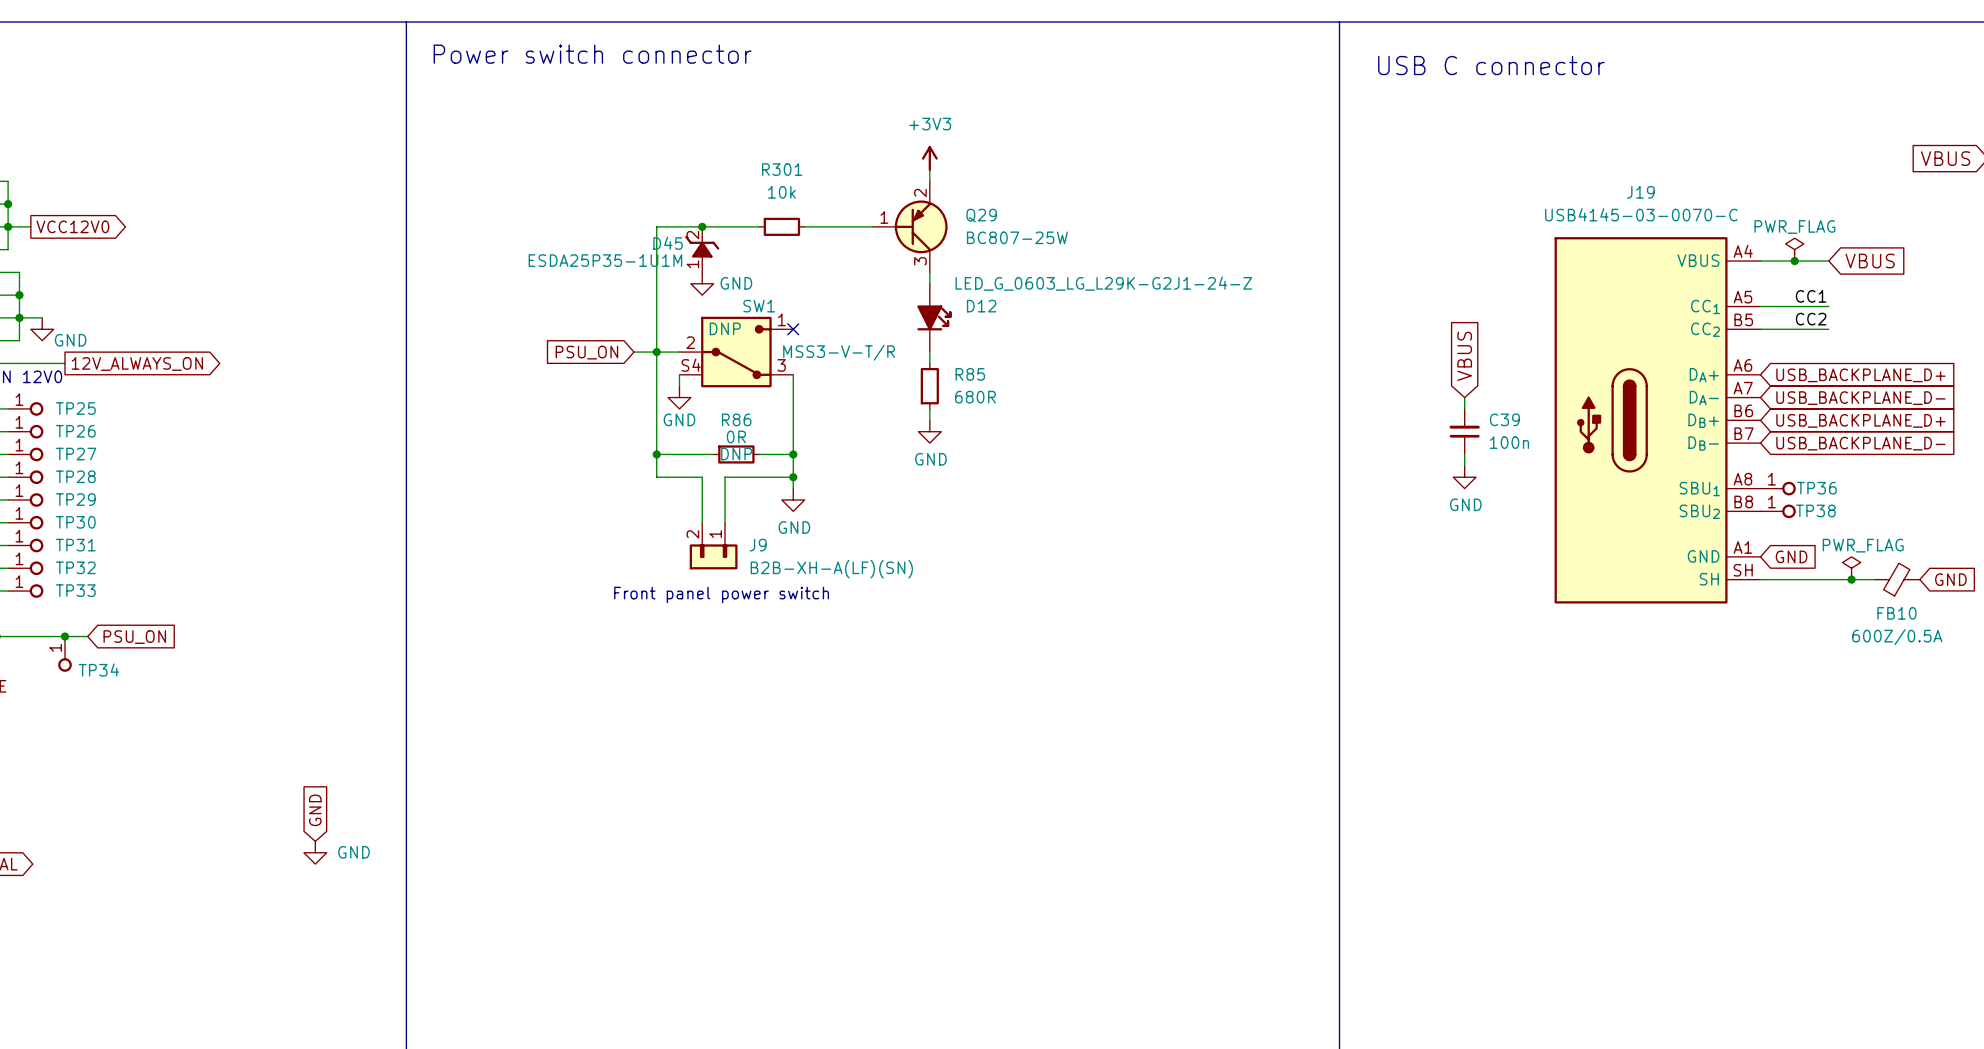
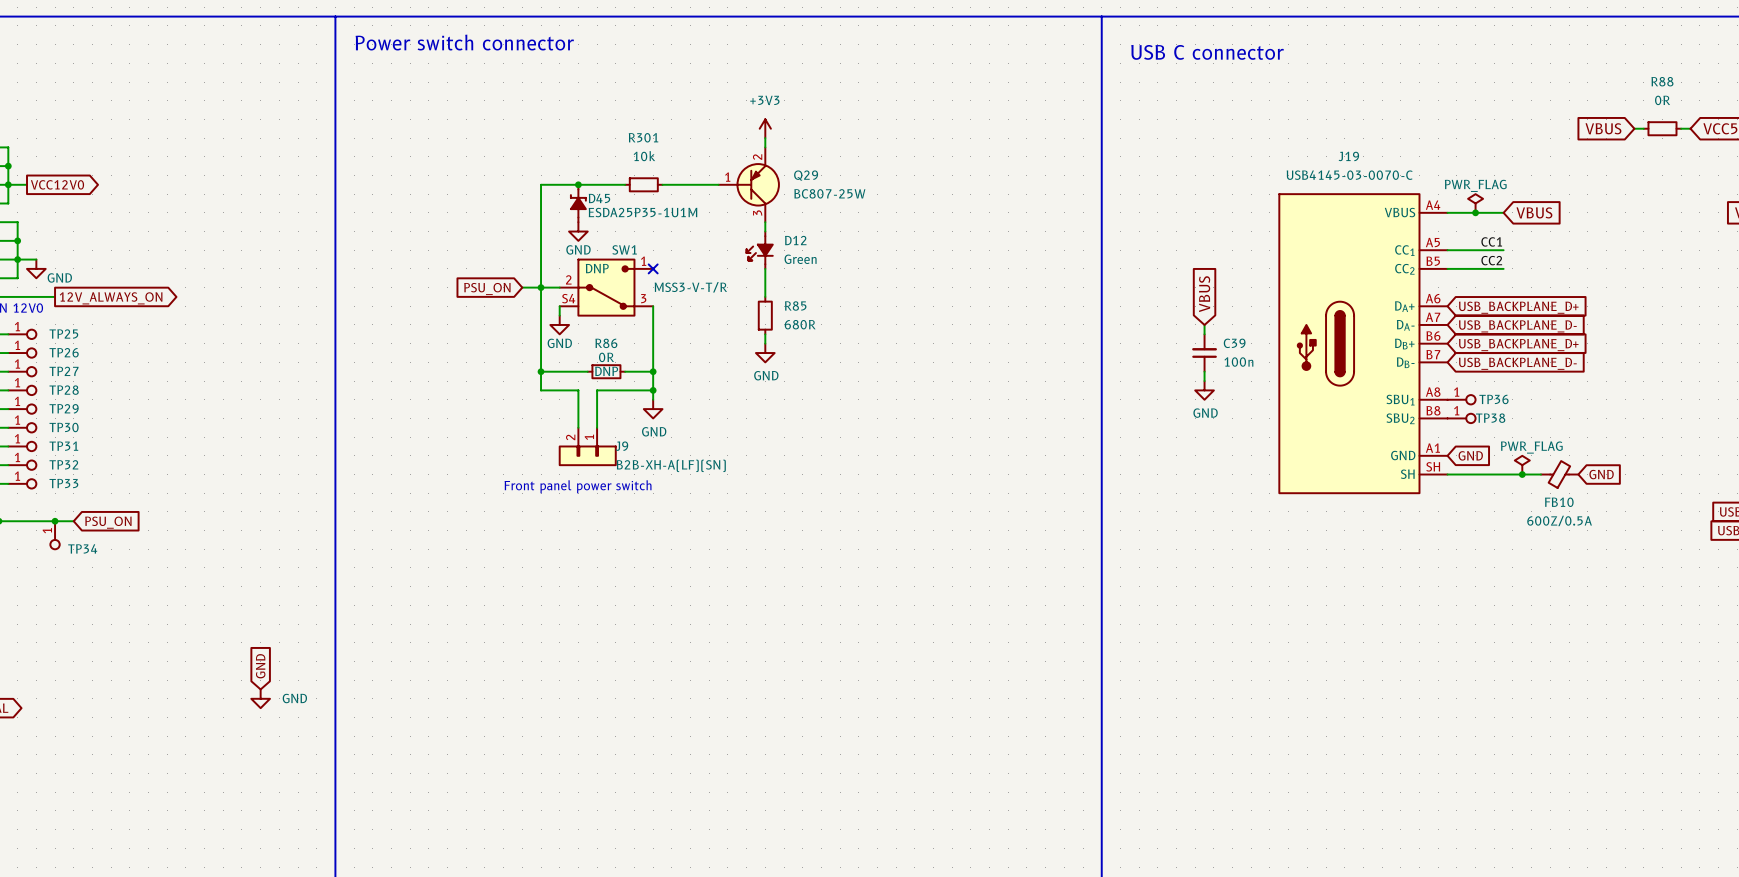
D45 symbol: [685, 226, 720, 273] -> [569, 184, 587, 223]
D45 name position: D45 (668, 243) -> D45 (599, 198)
D45 value position: ESDA25P35-1U1M (605, 260) -> ESDA25P35-1U1M (642, 212)
power symbol text position: GND (736, 283) -> GND (578, 249)
D12 symbol: [917, 283, 952, 353] -> [745, 231, 774, 269]
D12 value: LED_G_0603_LG_L29K-G2J1-24-Z (1103, 283) -> none
D12 text: none -> Green (800, 259)
J9 symbol: [689, 522, 738, 570] -> [558, 427, 617, 467]

